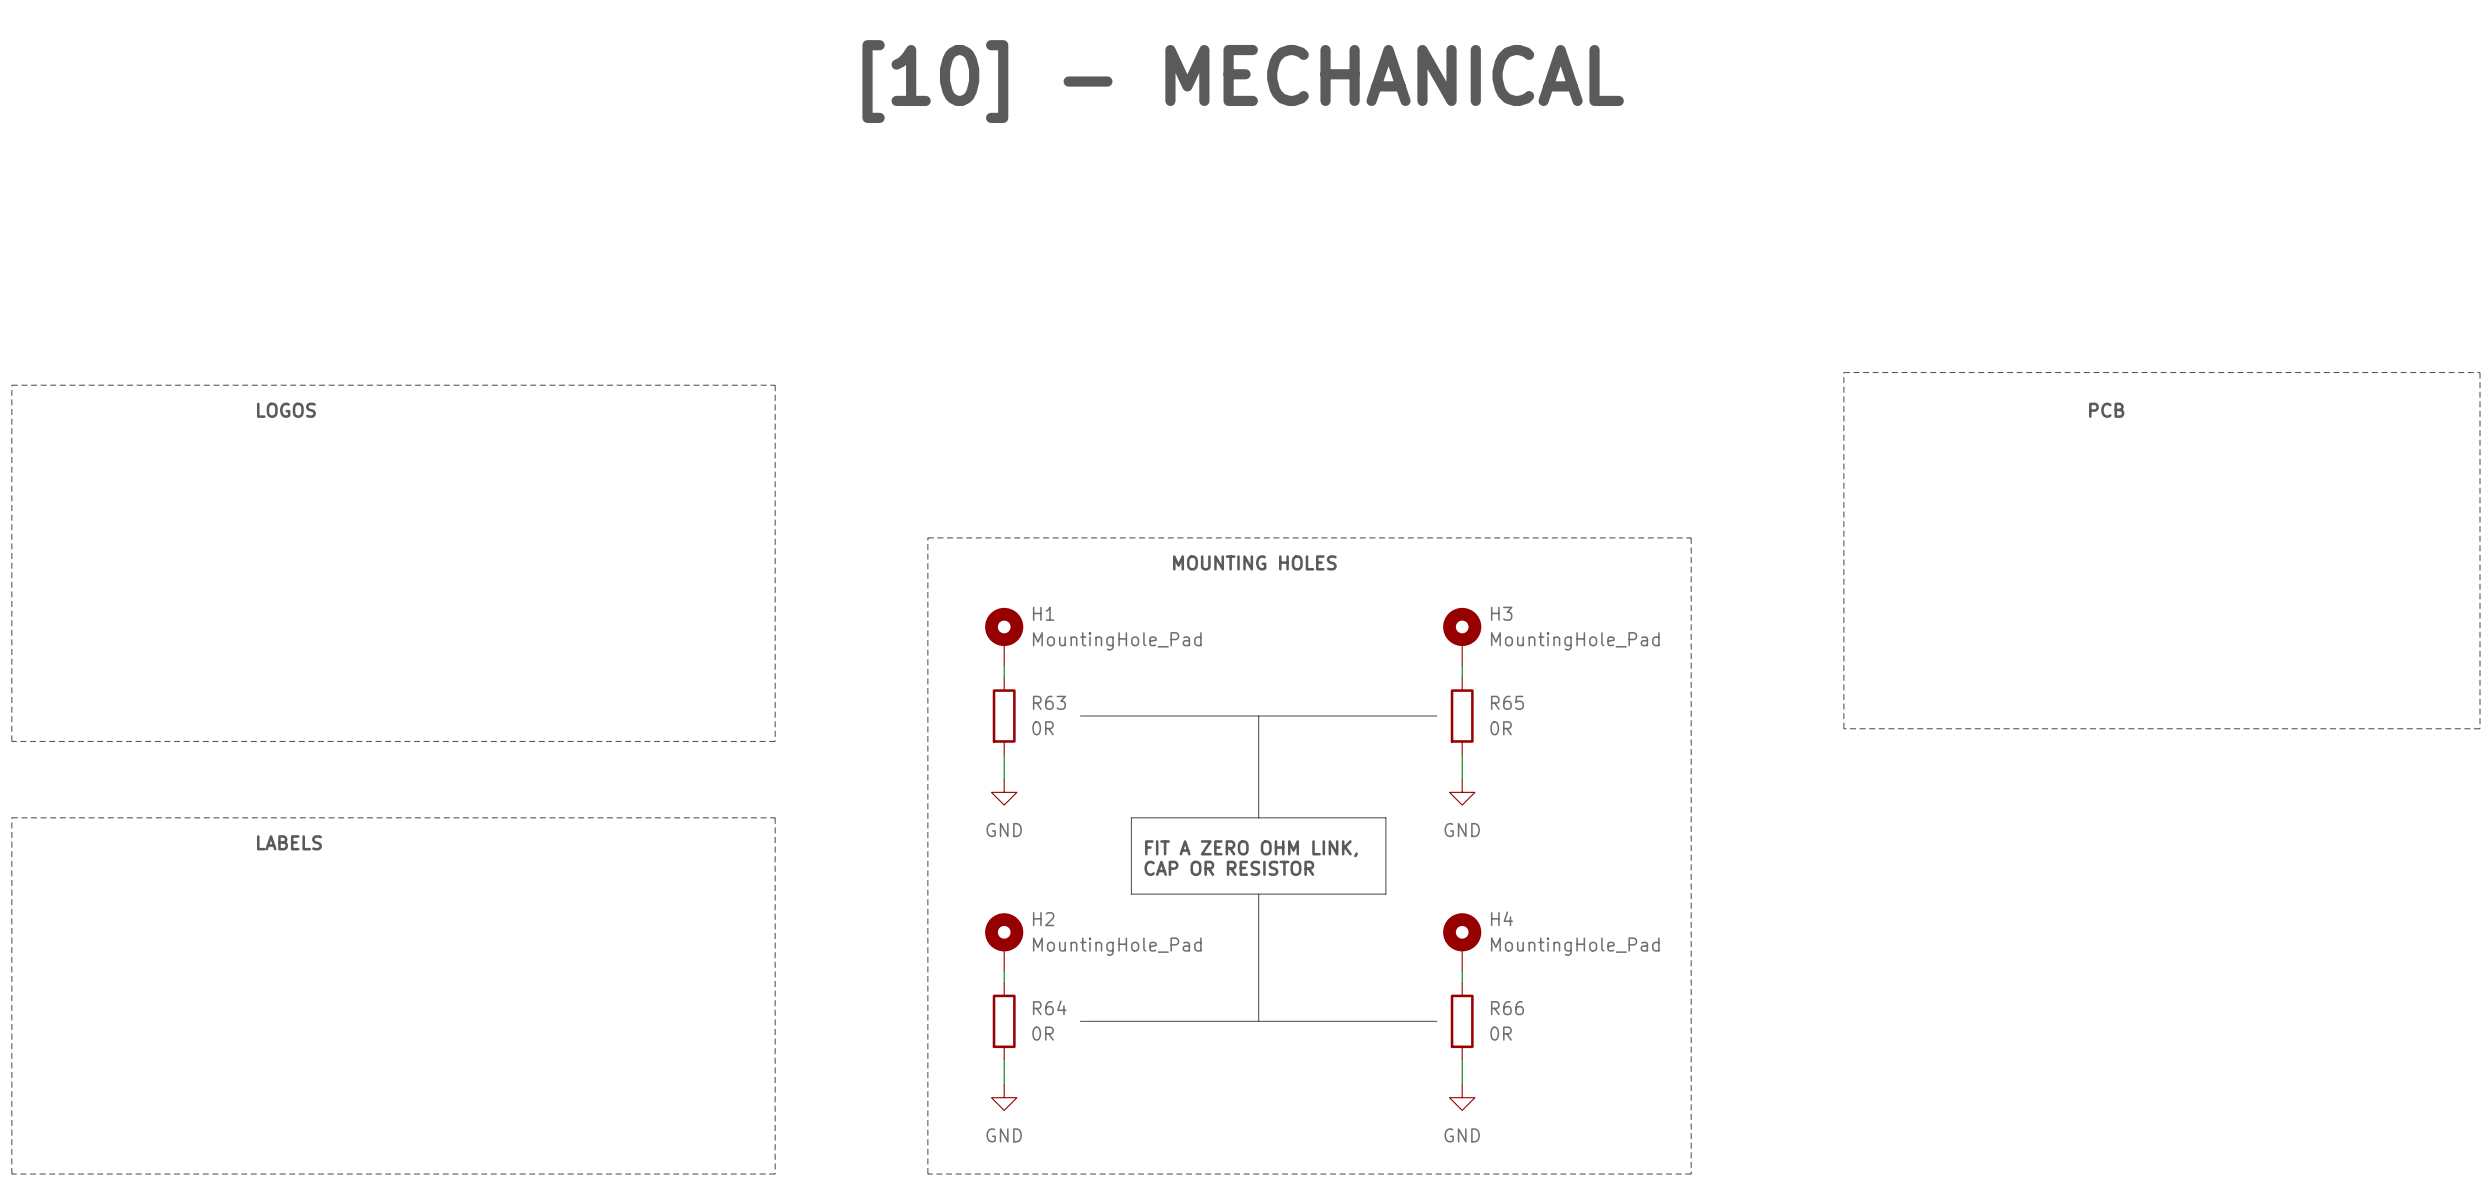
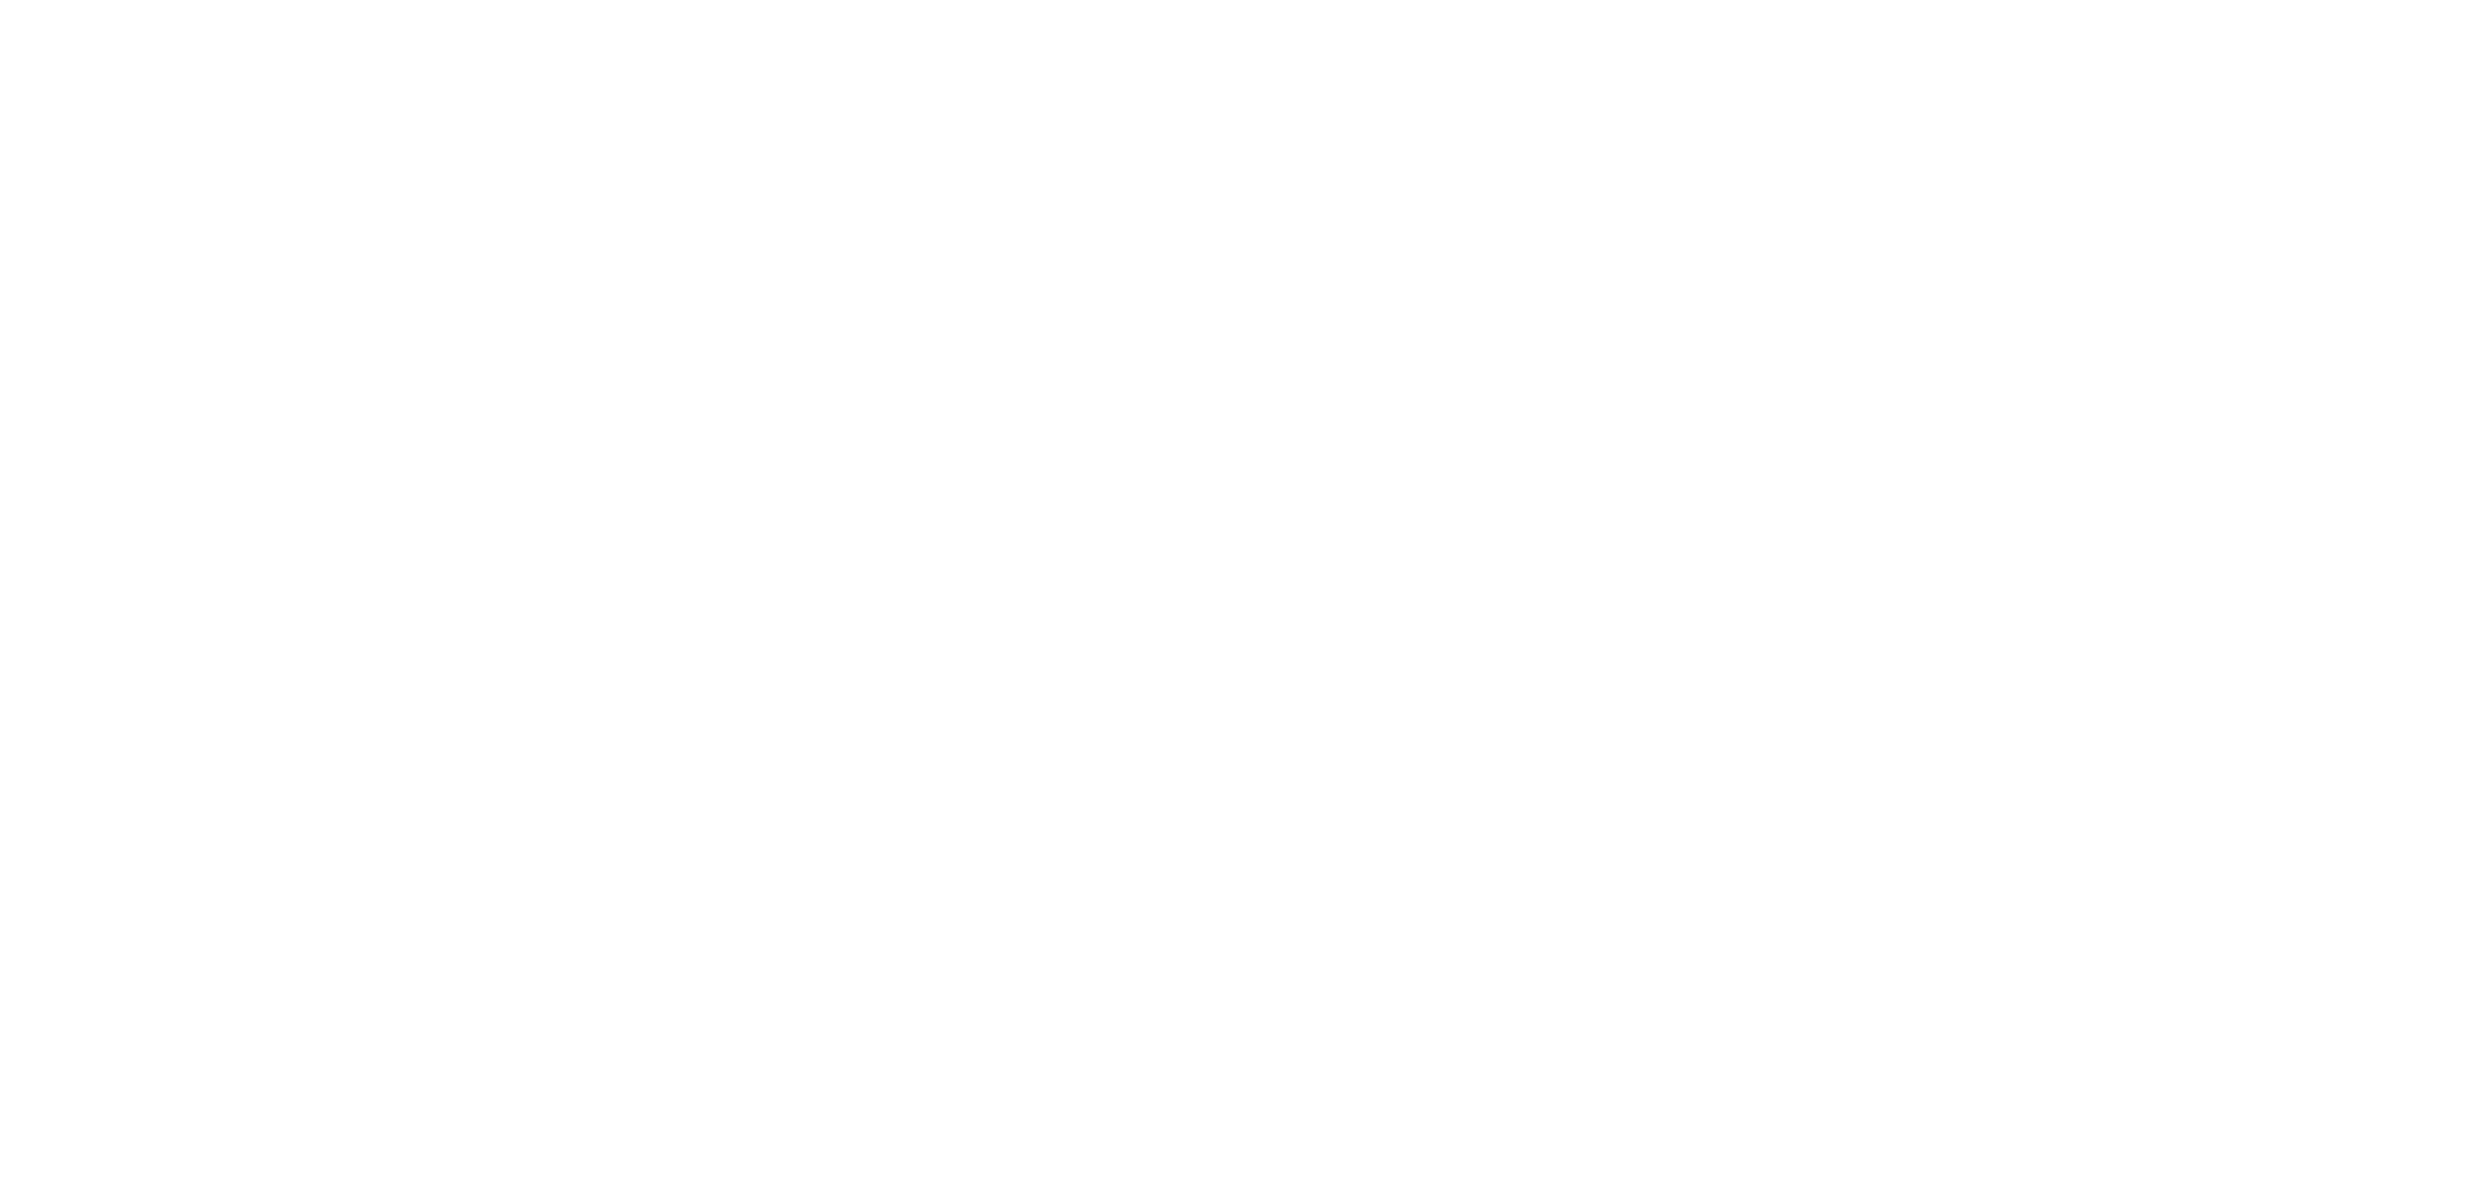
text: [10] - MECHANICAL (1243, 81) -> none
line: (1843, 372) (1843, 728) (2480, 728) (2480, 372) (1843, 372) -> none
line: (11, 385) (11, 741) (775, 741) (775, 385) (11, 385) -> none
text: LOGOS (286, 410) -> none
text: PCB (2106, 410) -> none
line: (927, 537) (1691, 537) (1691, 1174) (927, 1174) (927, 537) -> none
text: MOUNTING HOLES (1254, 562) -> none
H1: MountingHole_Pad (1004, 636) -> none
H3: MountingHole_Pad (1462, 636) -> none
wire: (1004, 665) (1004, 677) -> none
wire: (1462, 665) (1462, 677) -> none
R63: 0R (1004, 716) -> none
line: (1080, 716) (1436, 716) -> none
line: (1258, 716) (1258, 817) -> none
R65: 0R (1462, 716) -> none
wire: (1004, 754) (1004, 779) -> none
wire: (1462, 754) (1462, 779) -> none
power symbol: GND (1004, 792) -> none
power symbol: GND (1462, 792) -> none
line: (11, 817) (11, 1174) (775, 1174) (775, 817) (11, 817) -> none
line: (1131, 817) (1131, 894) (1385, 894) (1385, 817) (1131, 817) -> none
text: LABELS (289, 842) -> none
text: FIT A ZERO OHM LINK, (1251, 848) -> none
text: CAP OR RESISTOR (1229, 868) -> none
line: (1258, 894) (1258, 1021) -> none
H2: MountingHole_Pad (1004, 941) -> none
H4: MountingHole_Pad (1462, 941) -> none
wire: (1004, 970) (1004, 983) -> none
wire: (1462, 970) (1462, 983) -> none
R64: 0R (1004, 1021) -> none
line: (1080, 1021) (1436, 1021) -> none
R66: 0R (1462, 1021) -> none
wire: (1004, 1059) (1004, 1084) -> none
wire: (1462, 1059) (1462, 1084) -> none
power symbol: GND (1004, 1097) -> none
power symbol: GND (1462, 1097) -> none

